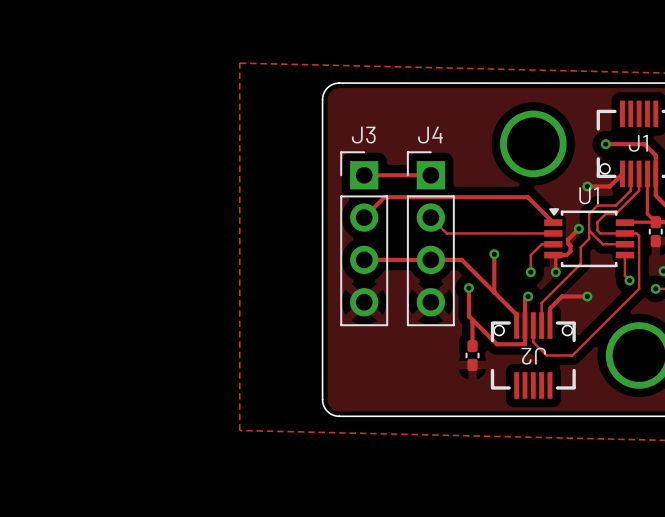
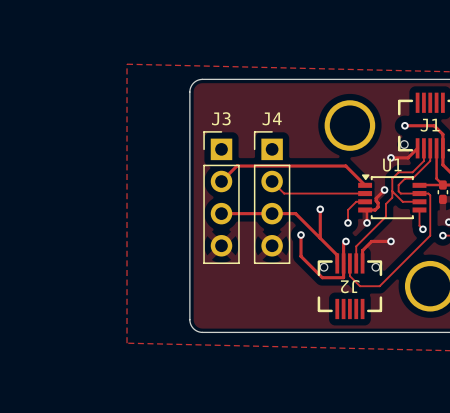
track: (364, 175) (430, 175) -> none
track: (473, 320) (472, 346) -> none
part: (472, 355) -> none

